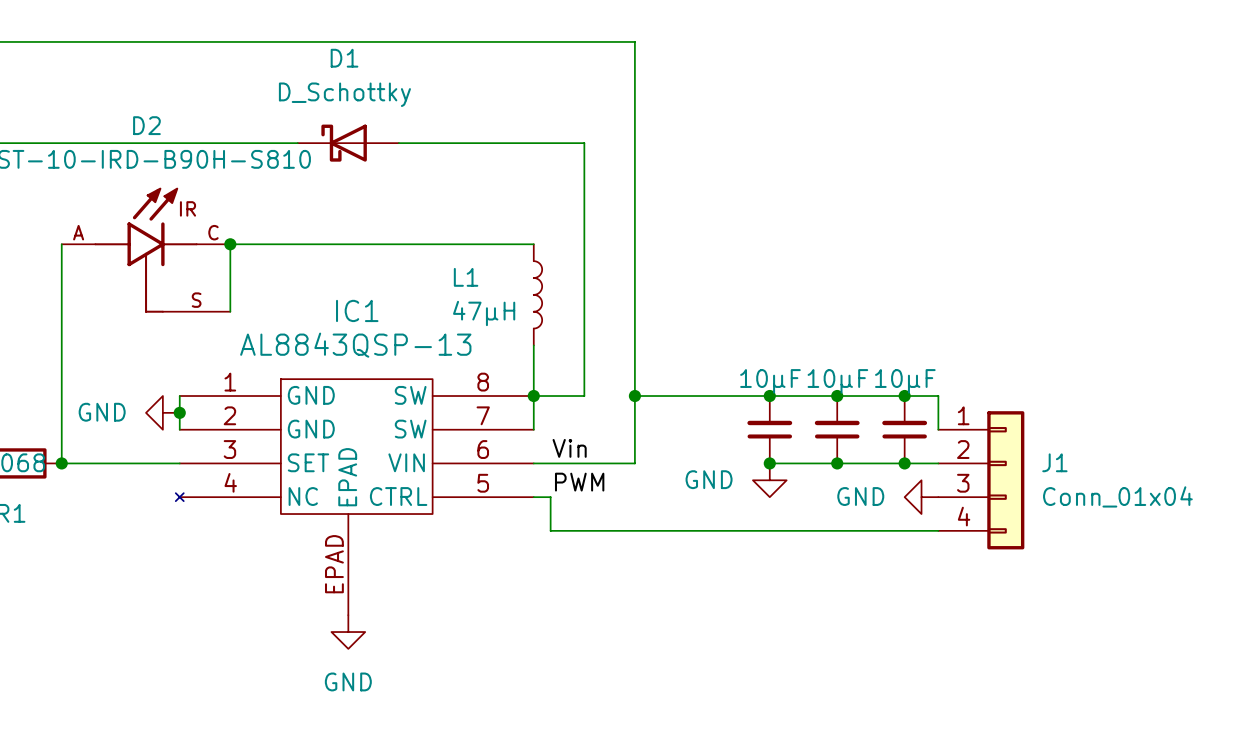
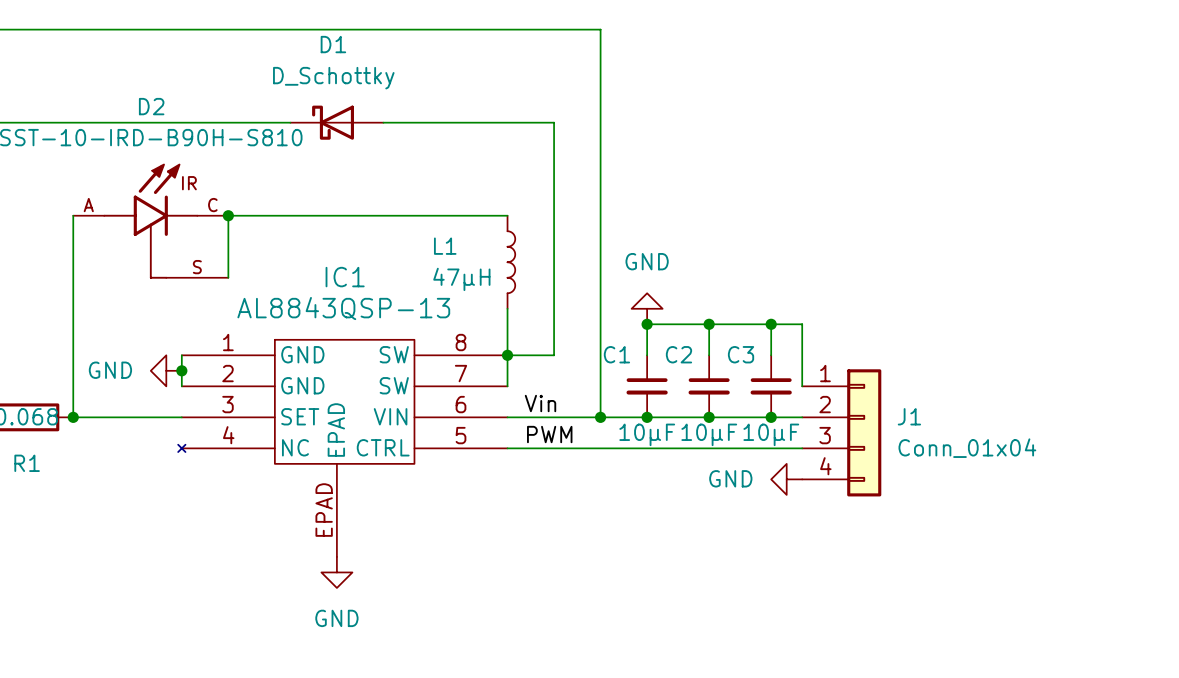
power symbol: none -> GND (647, 308)
junction: none -> (647, 324)
wire: none -> (709, 324) (709, 355)
junction: none -> (709, 324)
wire: none -> (771, 324) (771, 355)
junction: none -> (771, 324)
wire: (634, 396) (938, 396) (938, 429) -> none
junction: (634, 396) -> none
wire: none -> (647, 355) (647, 324) (802, 324) (802, 386)
junction: (769, 396) -> none
junction: (837, 396) -> none
junction: (904, 396) -> none
C1: none -> 10μF (647, 386)
C2: none -> 10μF (709, 386)
part: 10μF (769, 429) -> none
C3: none -> 10μF (771, 386)
part: 10μF (837, 429) -> none
part: 10μF (904, 429) -> none
wire: none -> (600, 417) (724, 417)
junction: none -> (600, 417)
junction: none -> (647, 417)
junction position: (769, 463) -> (709, 417)
junction position: (837, 463) -> (771, 417)
junction: (904, 463) -> none
power symbol: GND (769, 480) -> none
J1 position: (981, 480) -> (841, 432)
wire: (550, 497) (550, 530) (938, 530) -> (523, 448) (802, 448)
power symbol: GND (921, 497) -> none
power symbol: none -> GND (786, 479)

